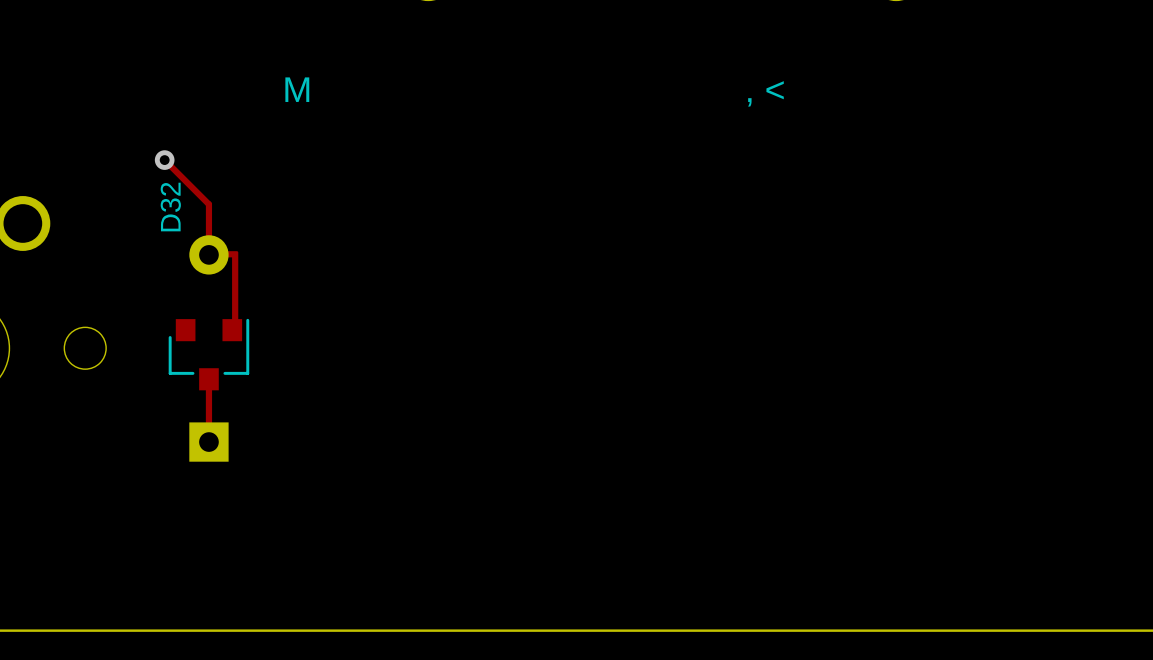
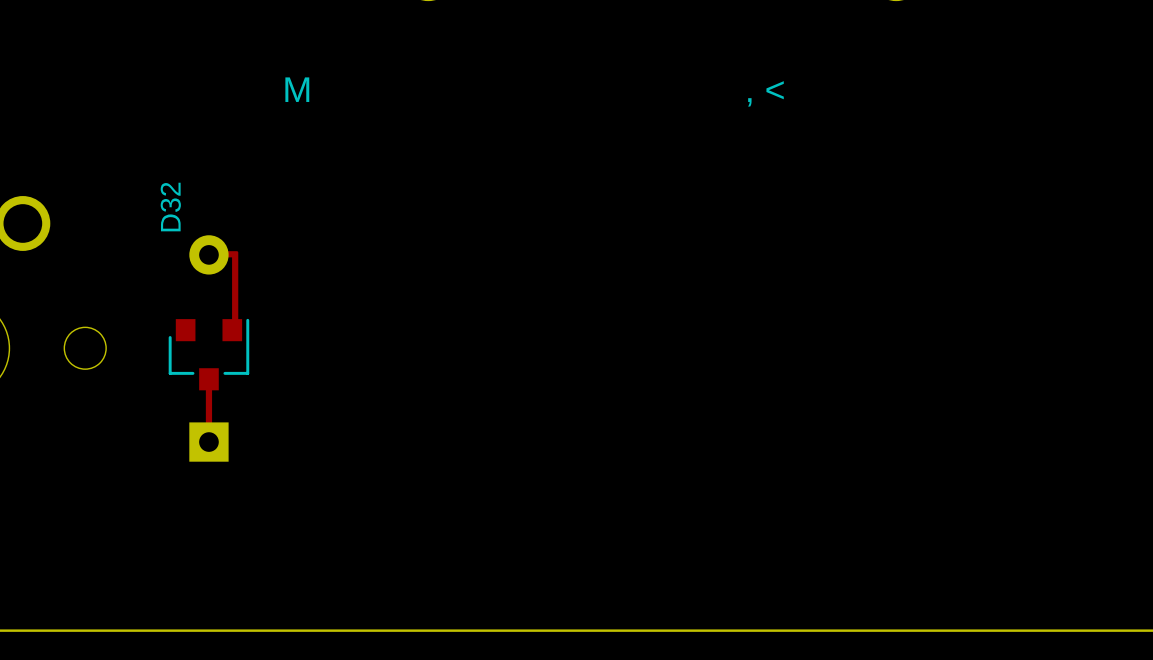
track: (164, 160) (208, 204) (208, 254) -> none
via: (164, 160) -> none

